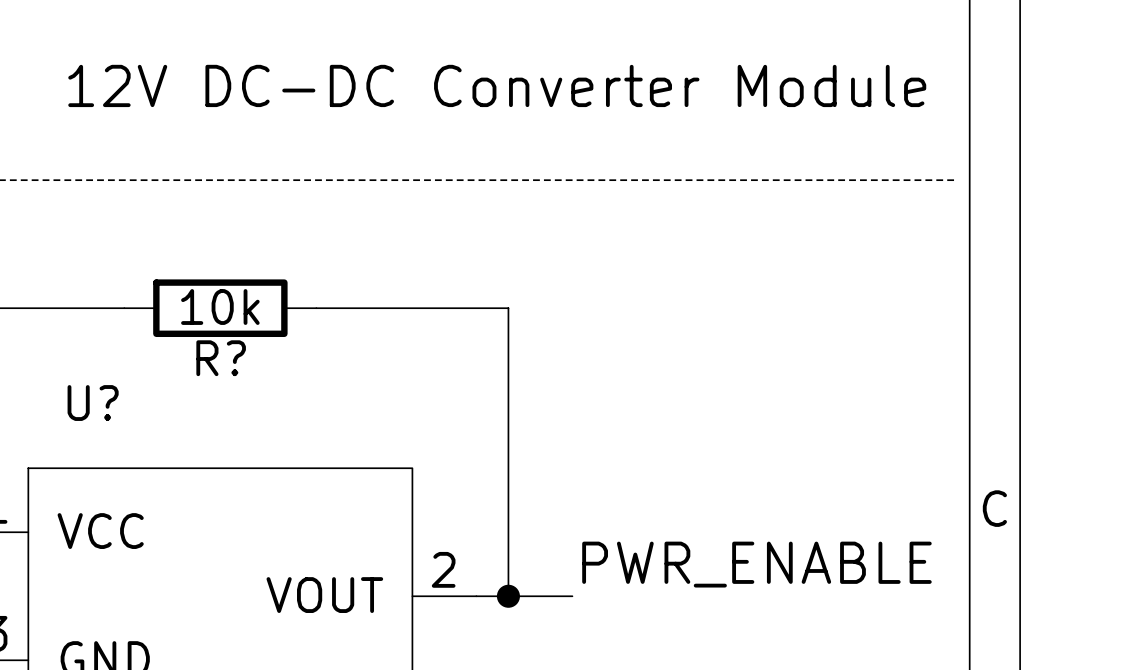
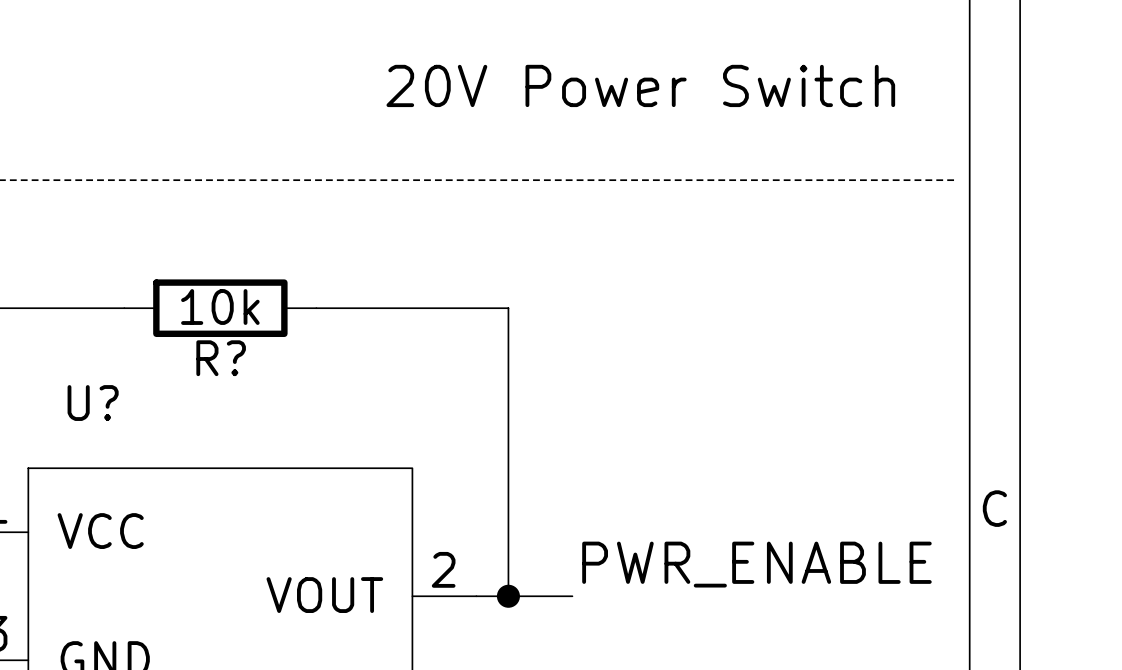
text: 12V DC-DC Converter Module (497, 85) -> none
text: none -> 20V Power Switch (640, 85)

